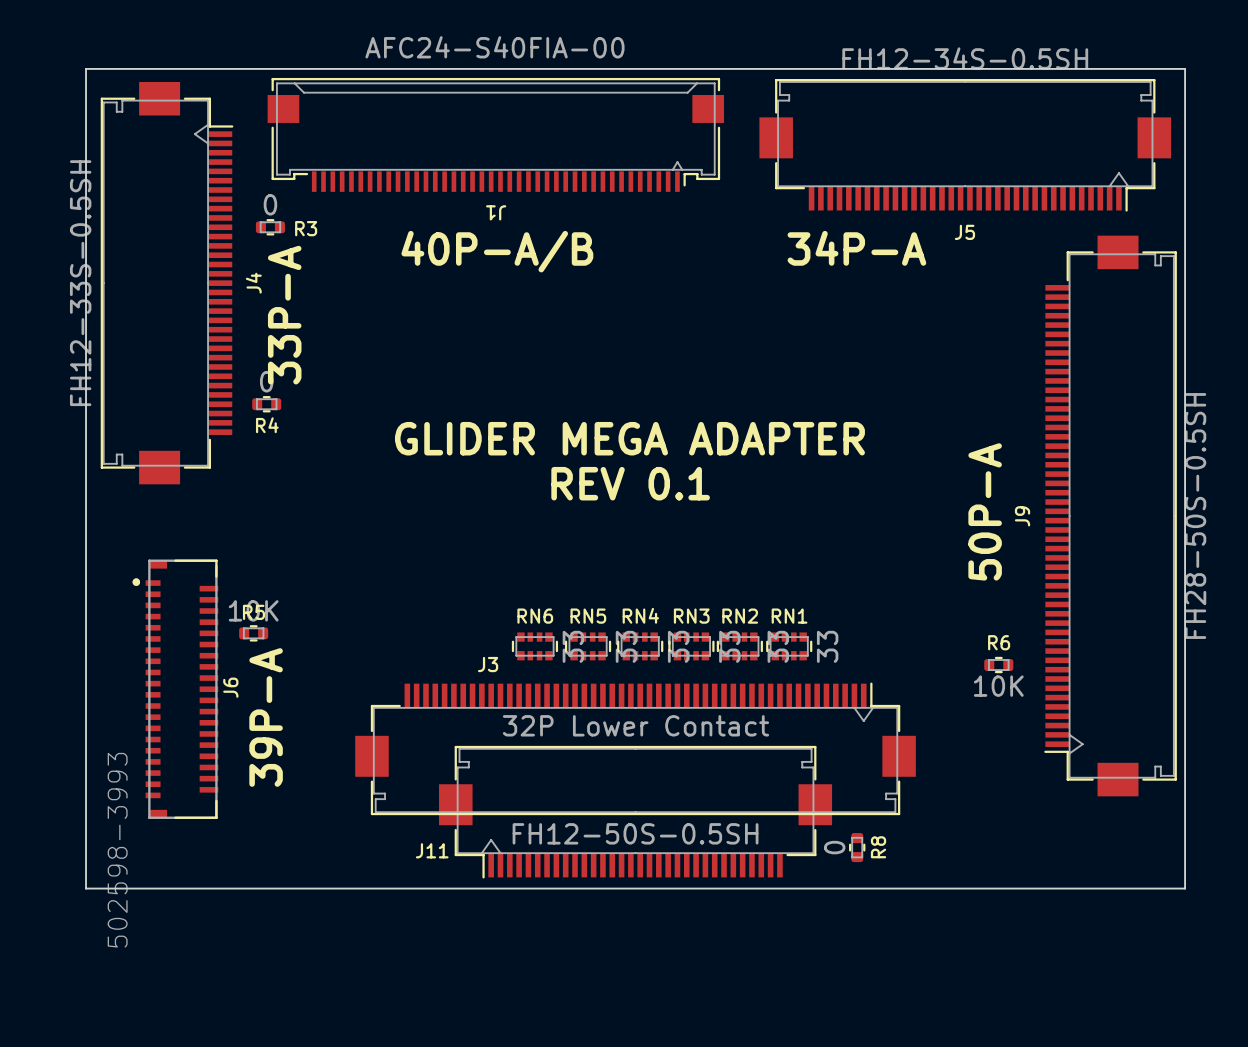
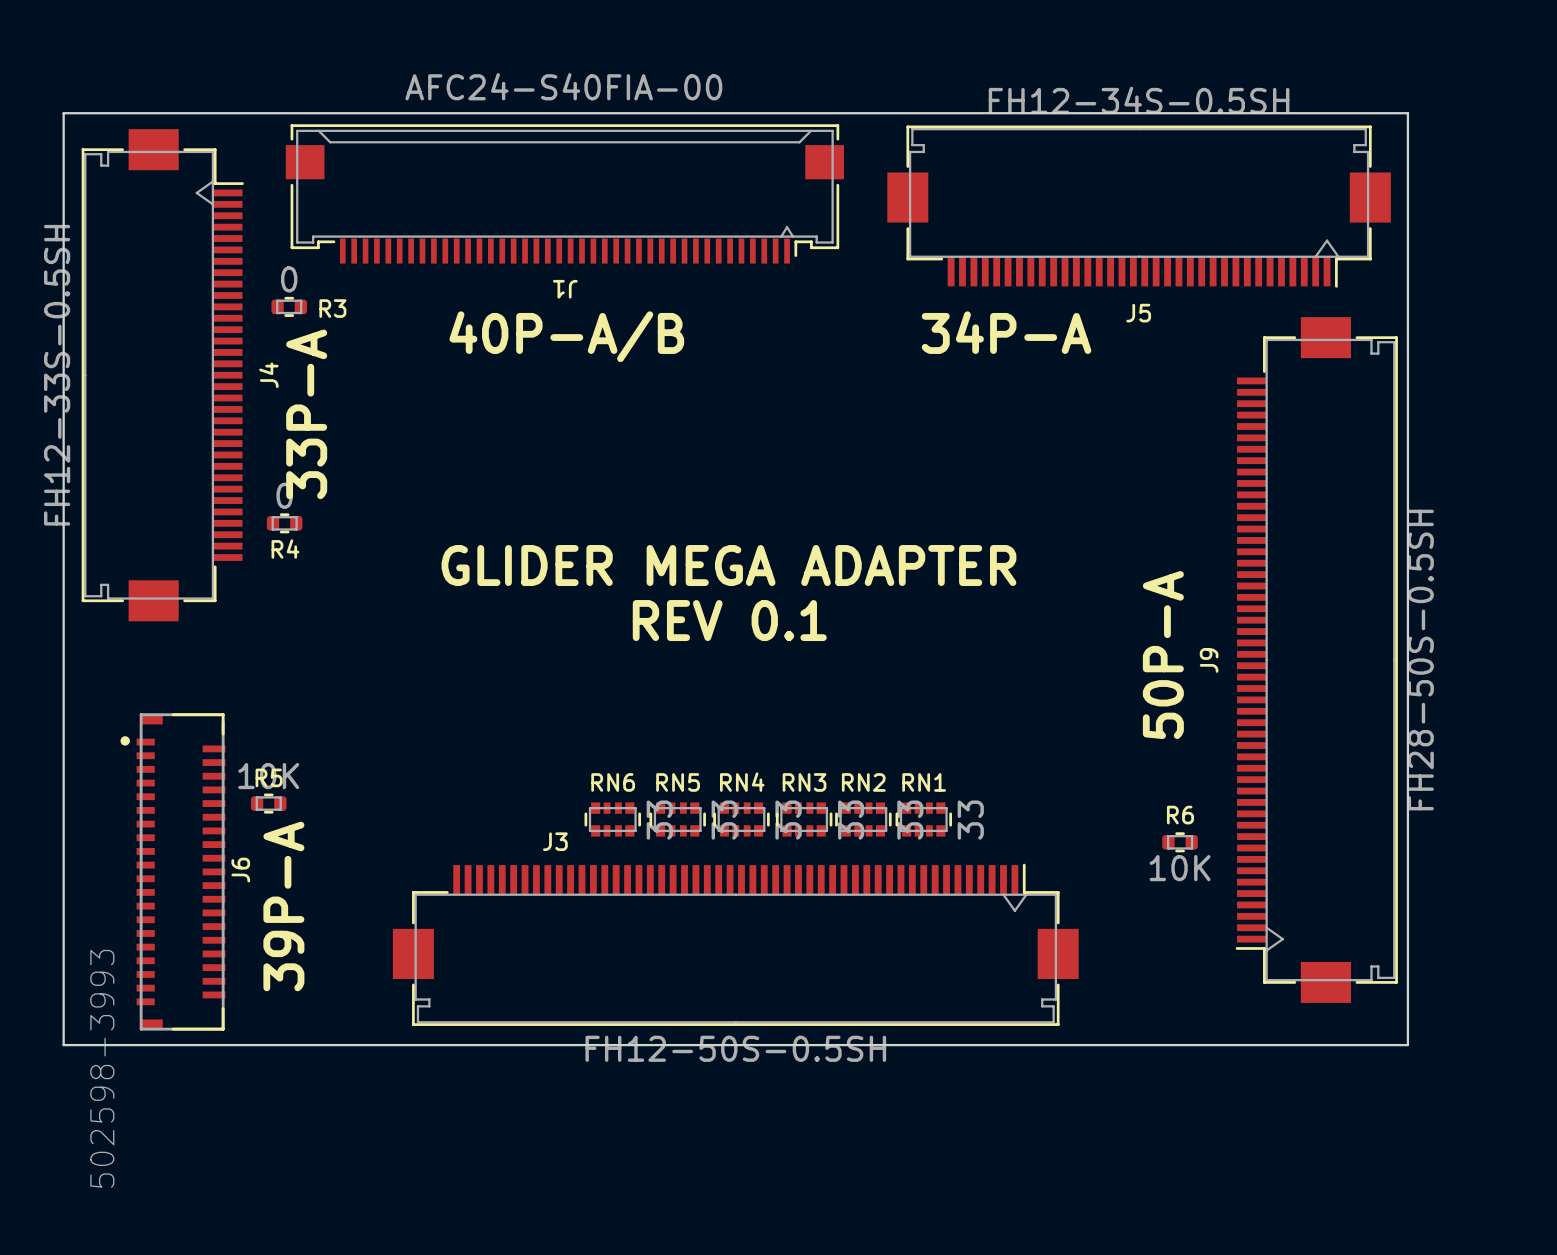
J11: 32P Lower Contact (635, 812) -> none
board edge: (86, 830) (86, 888) (1185, 888) (1185, 830) -> (63, 1045) (1407, 1045)
R8: 0 (857, 847) -> none

